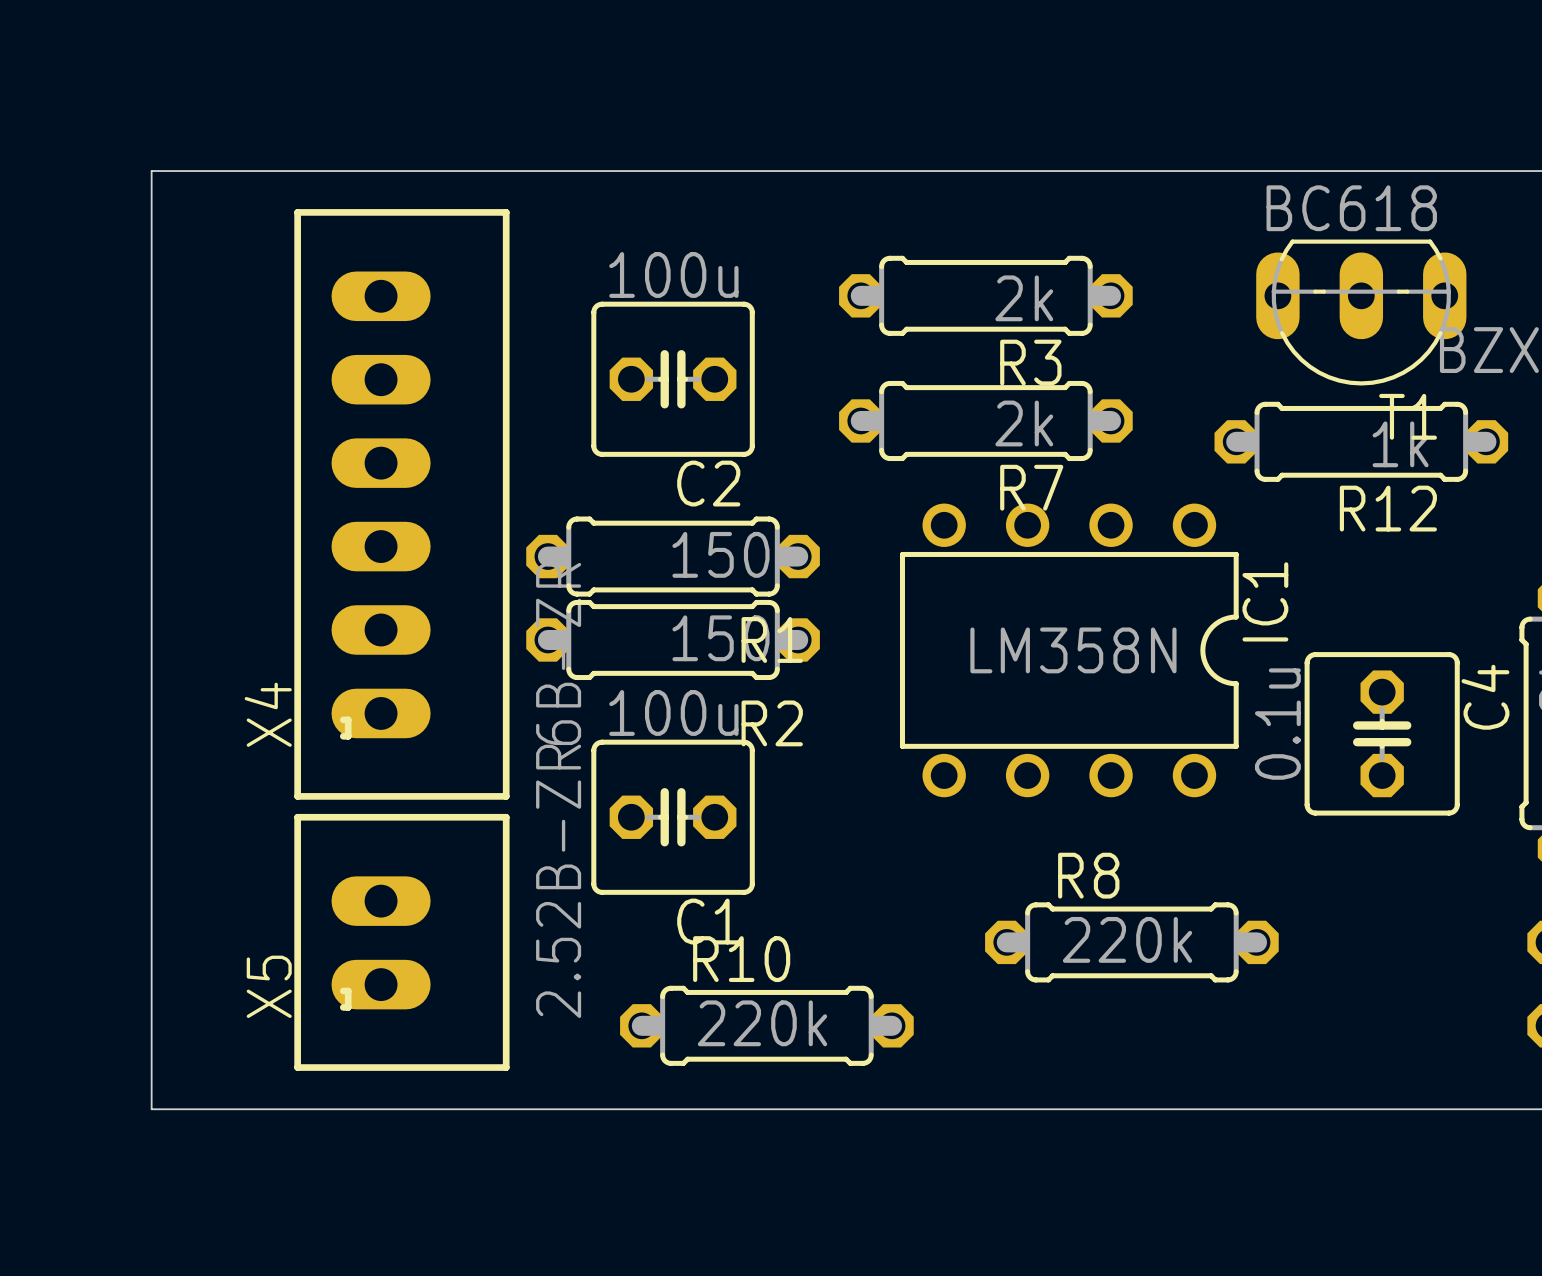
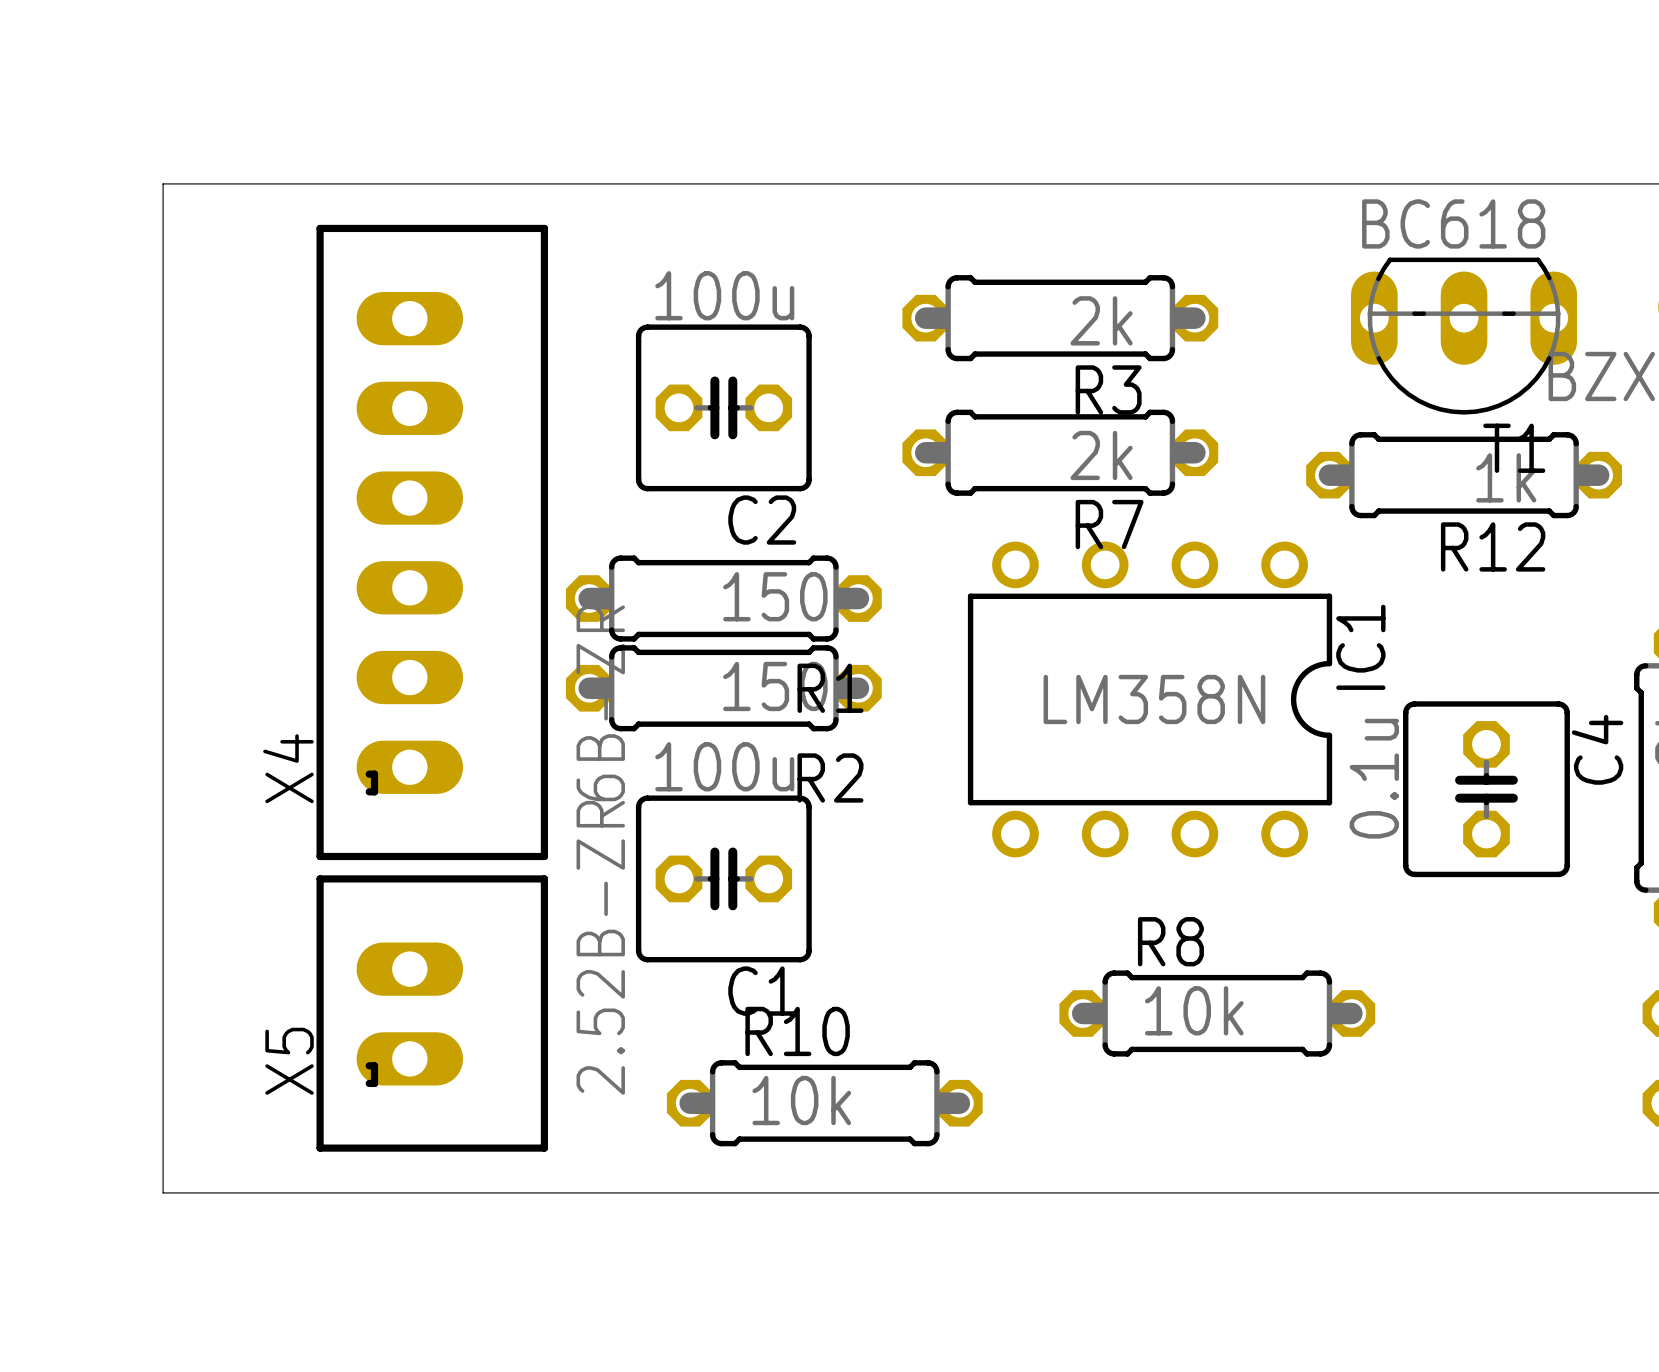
R8 value: 220k (1127, 939) -> 10k (1194, 1010)
R10 value: 220k (762, 1023) -> 10k (801, 1100)

